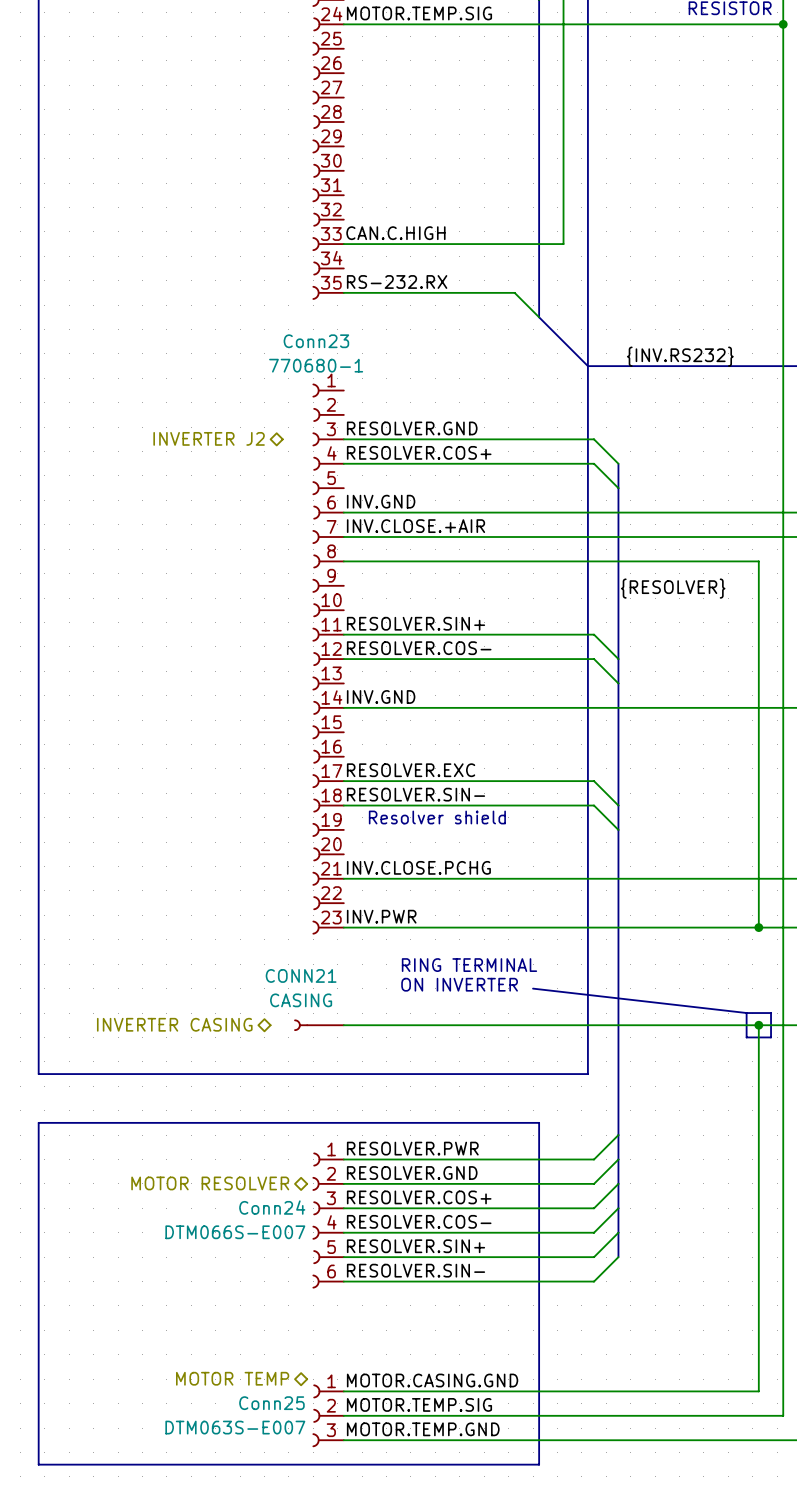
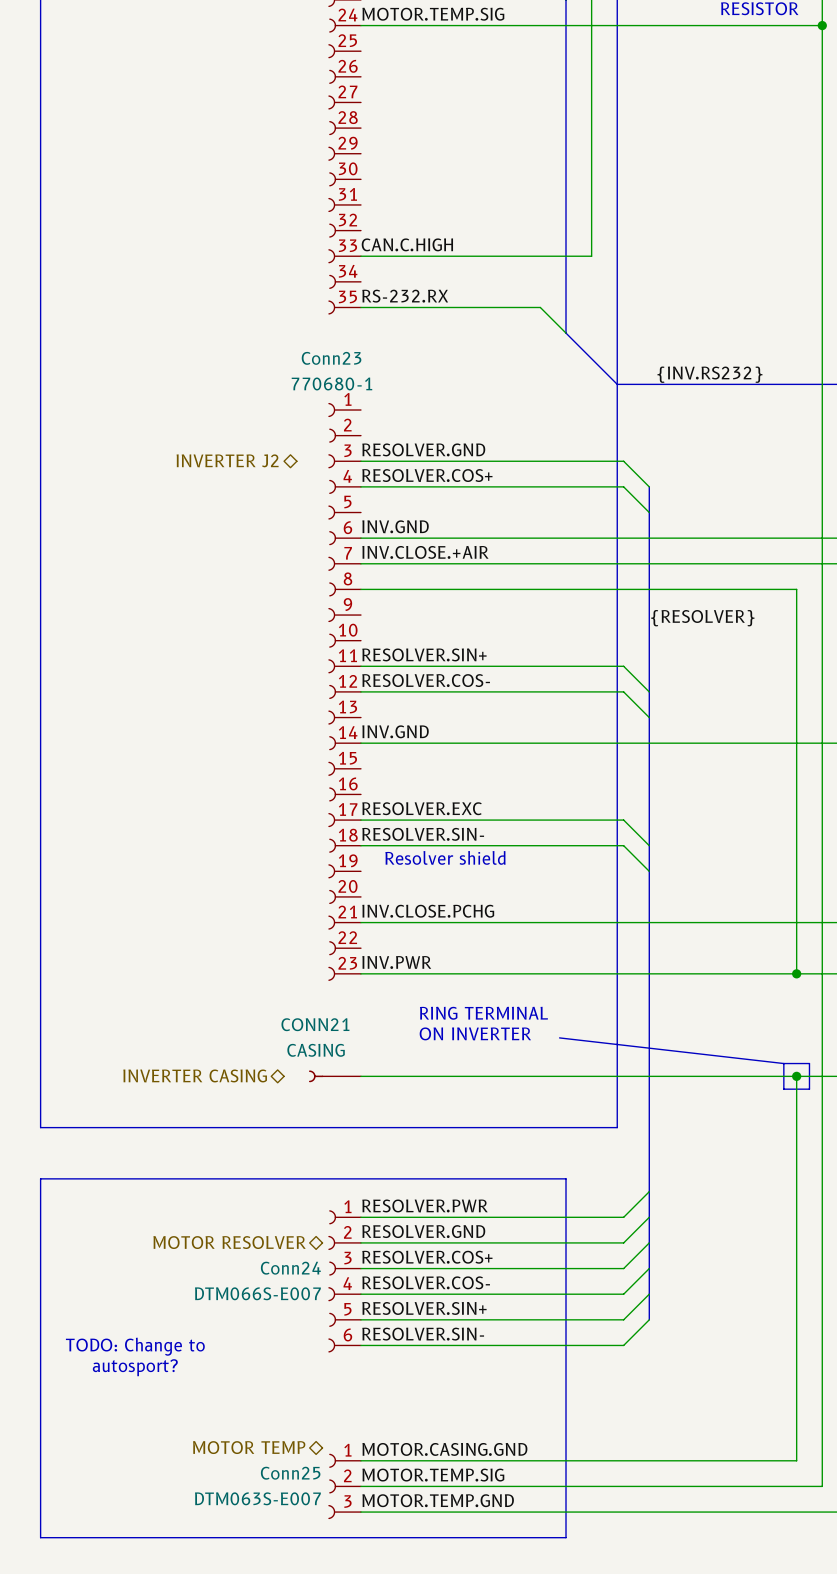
text: none -> TODO: Change to (135, 1346)
text: none -> autosport? (135, 1367)

